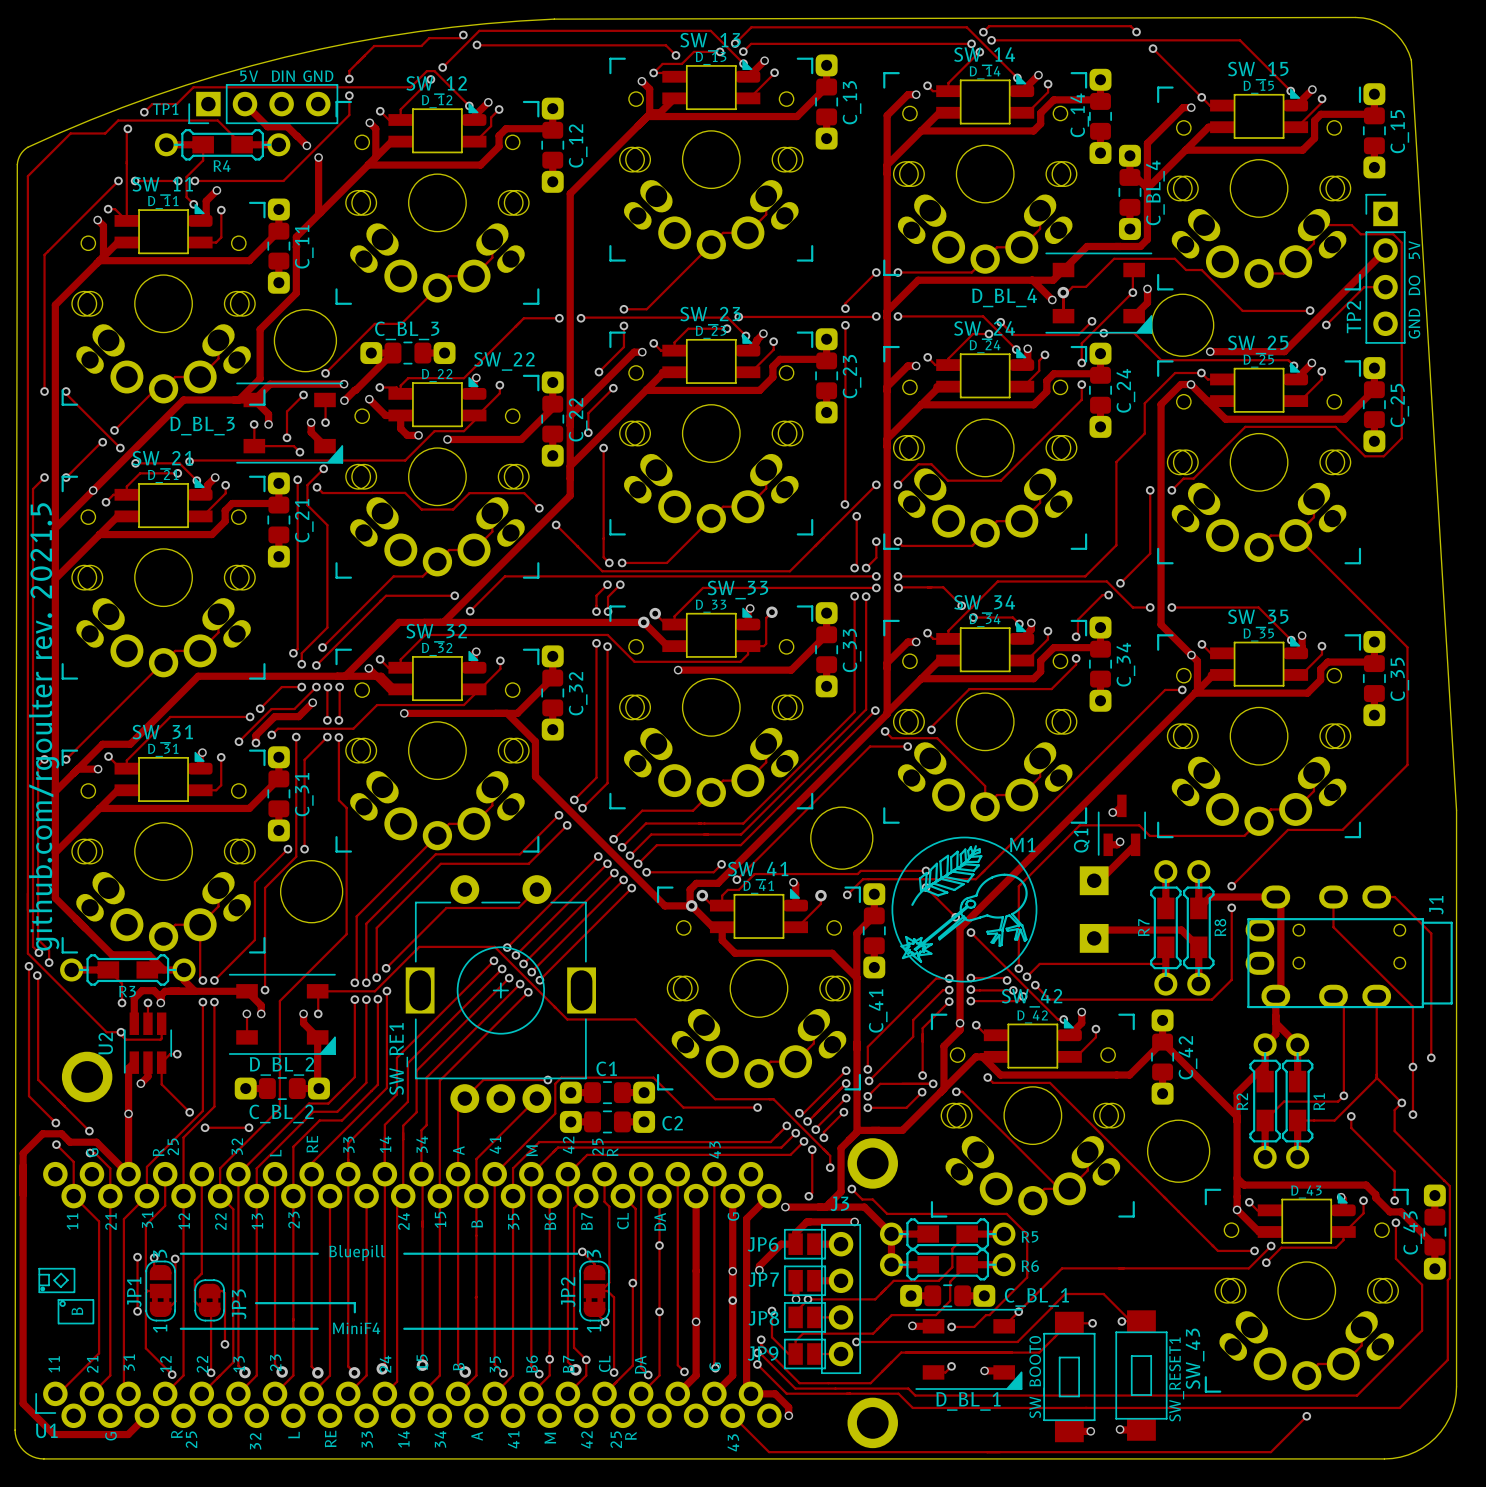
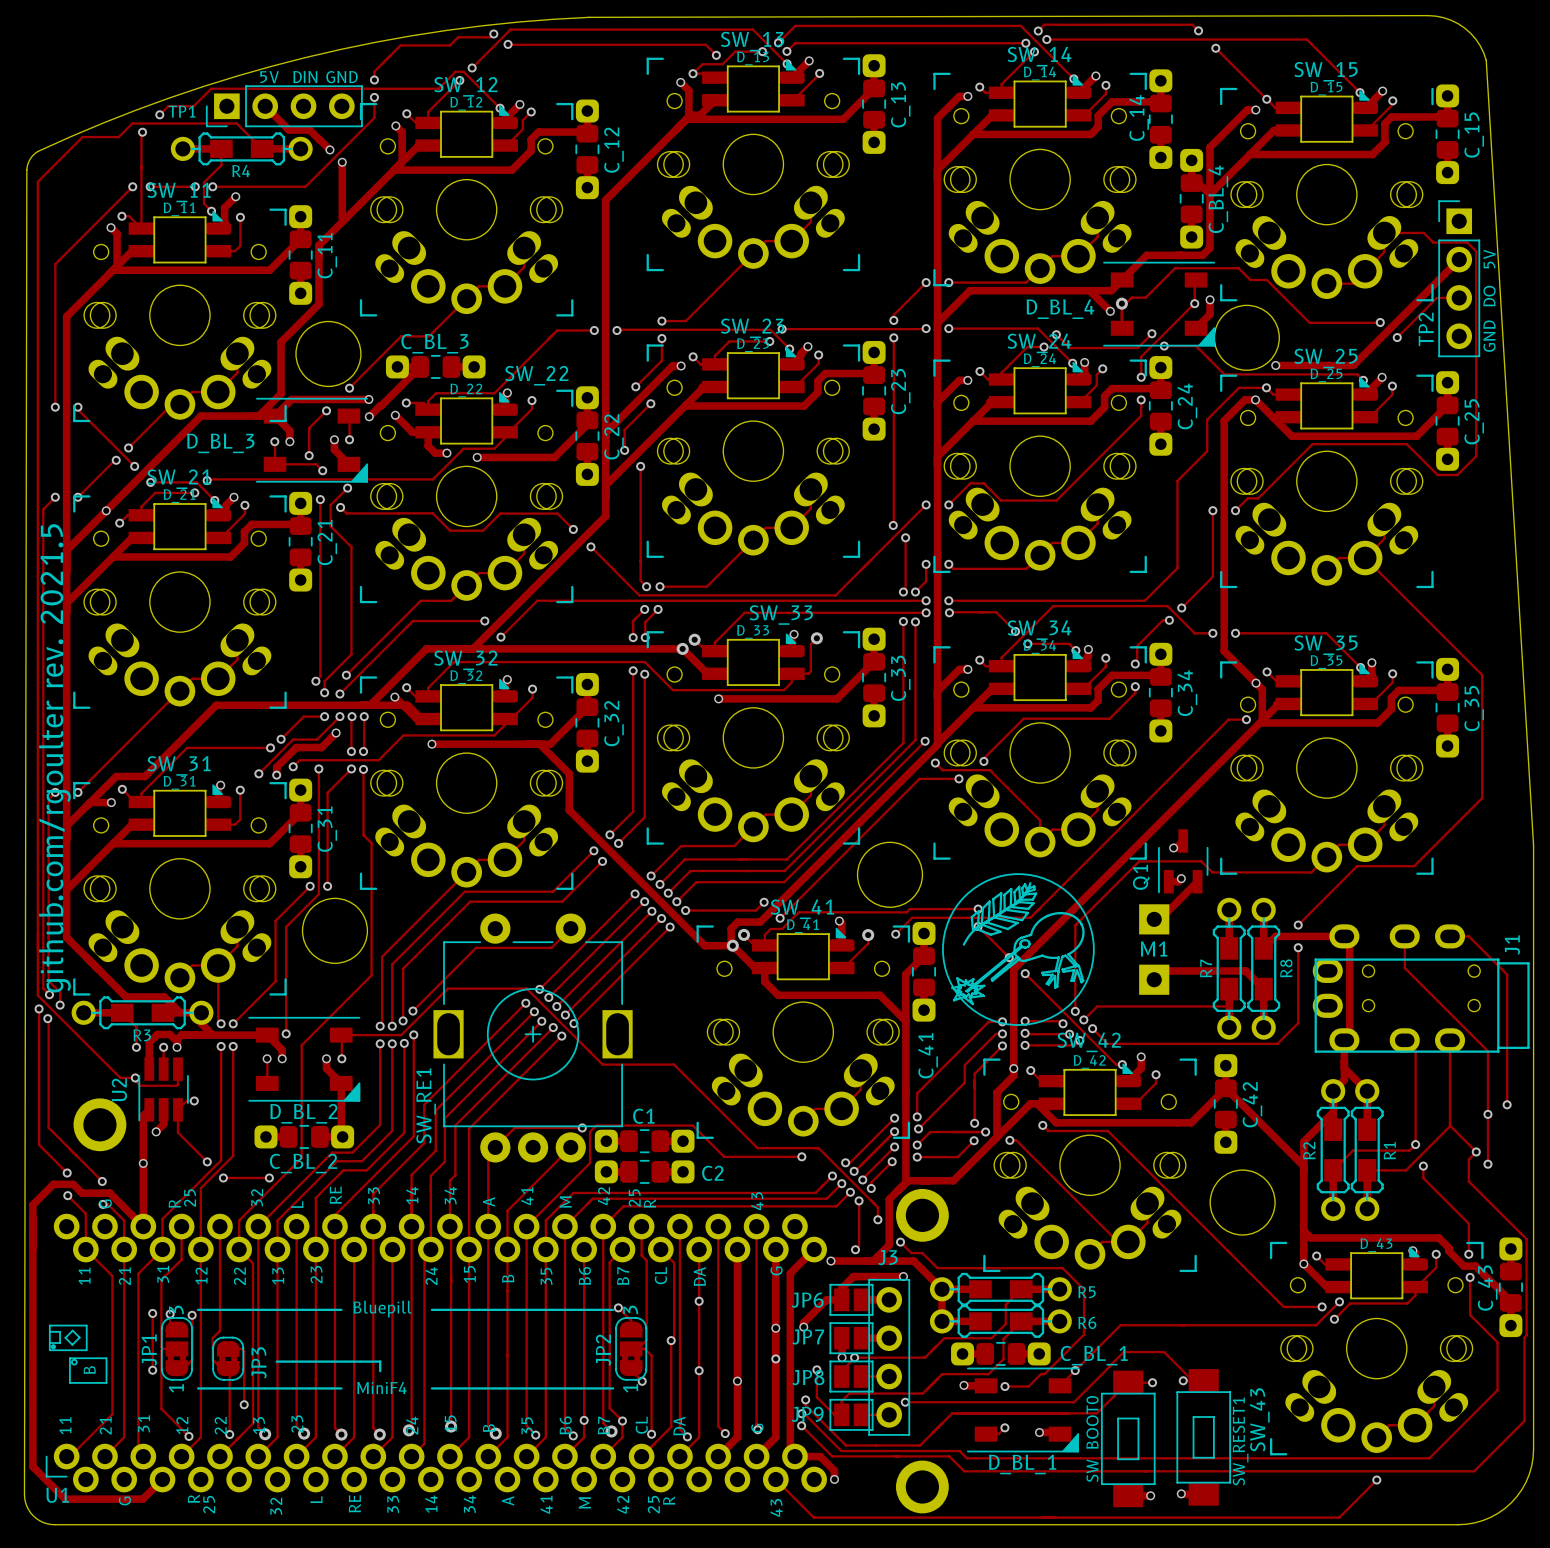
M1 name position: M1 (1022, 844) -> M1 (1154, 948)

